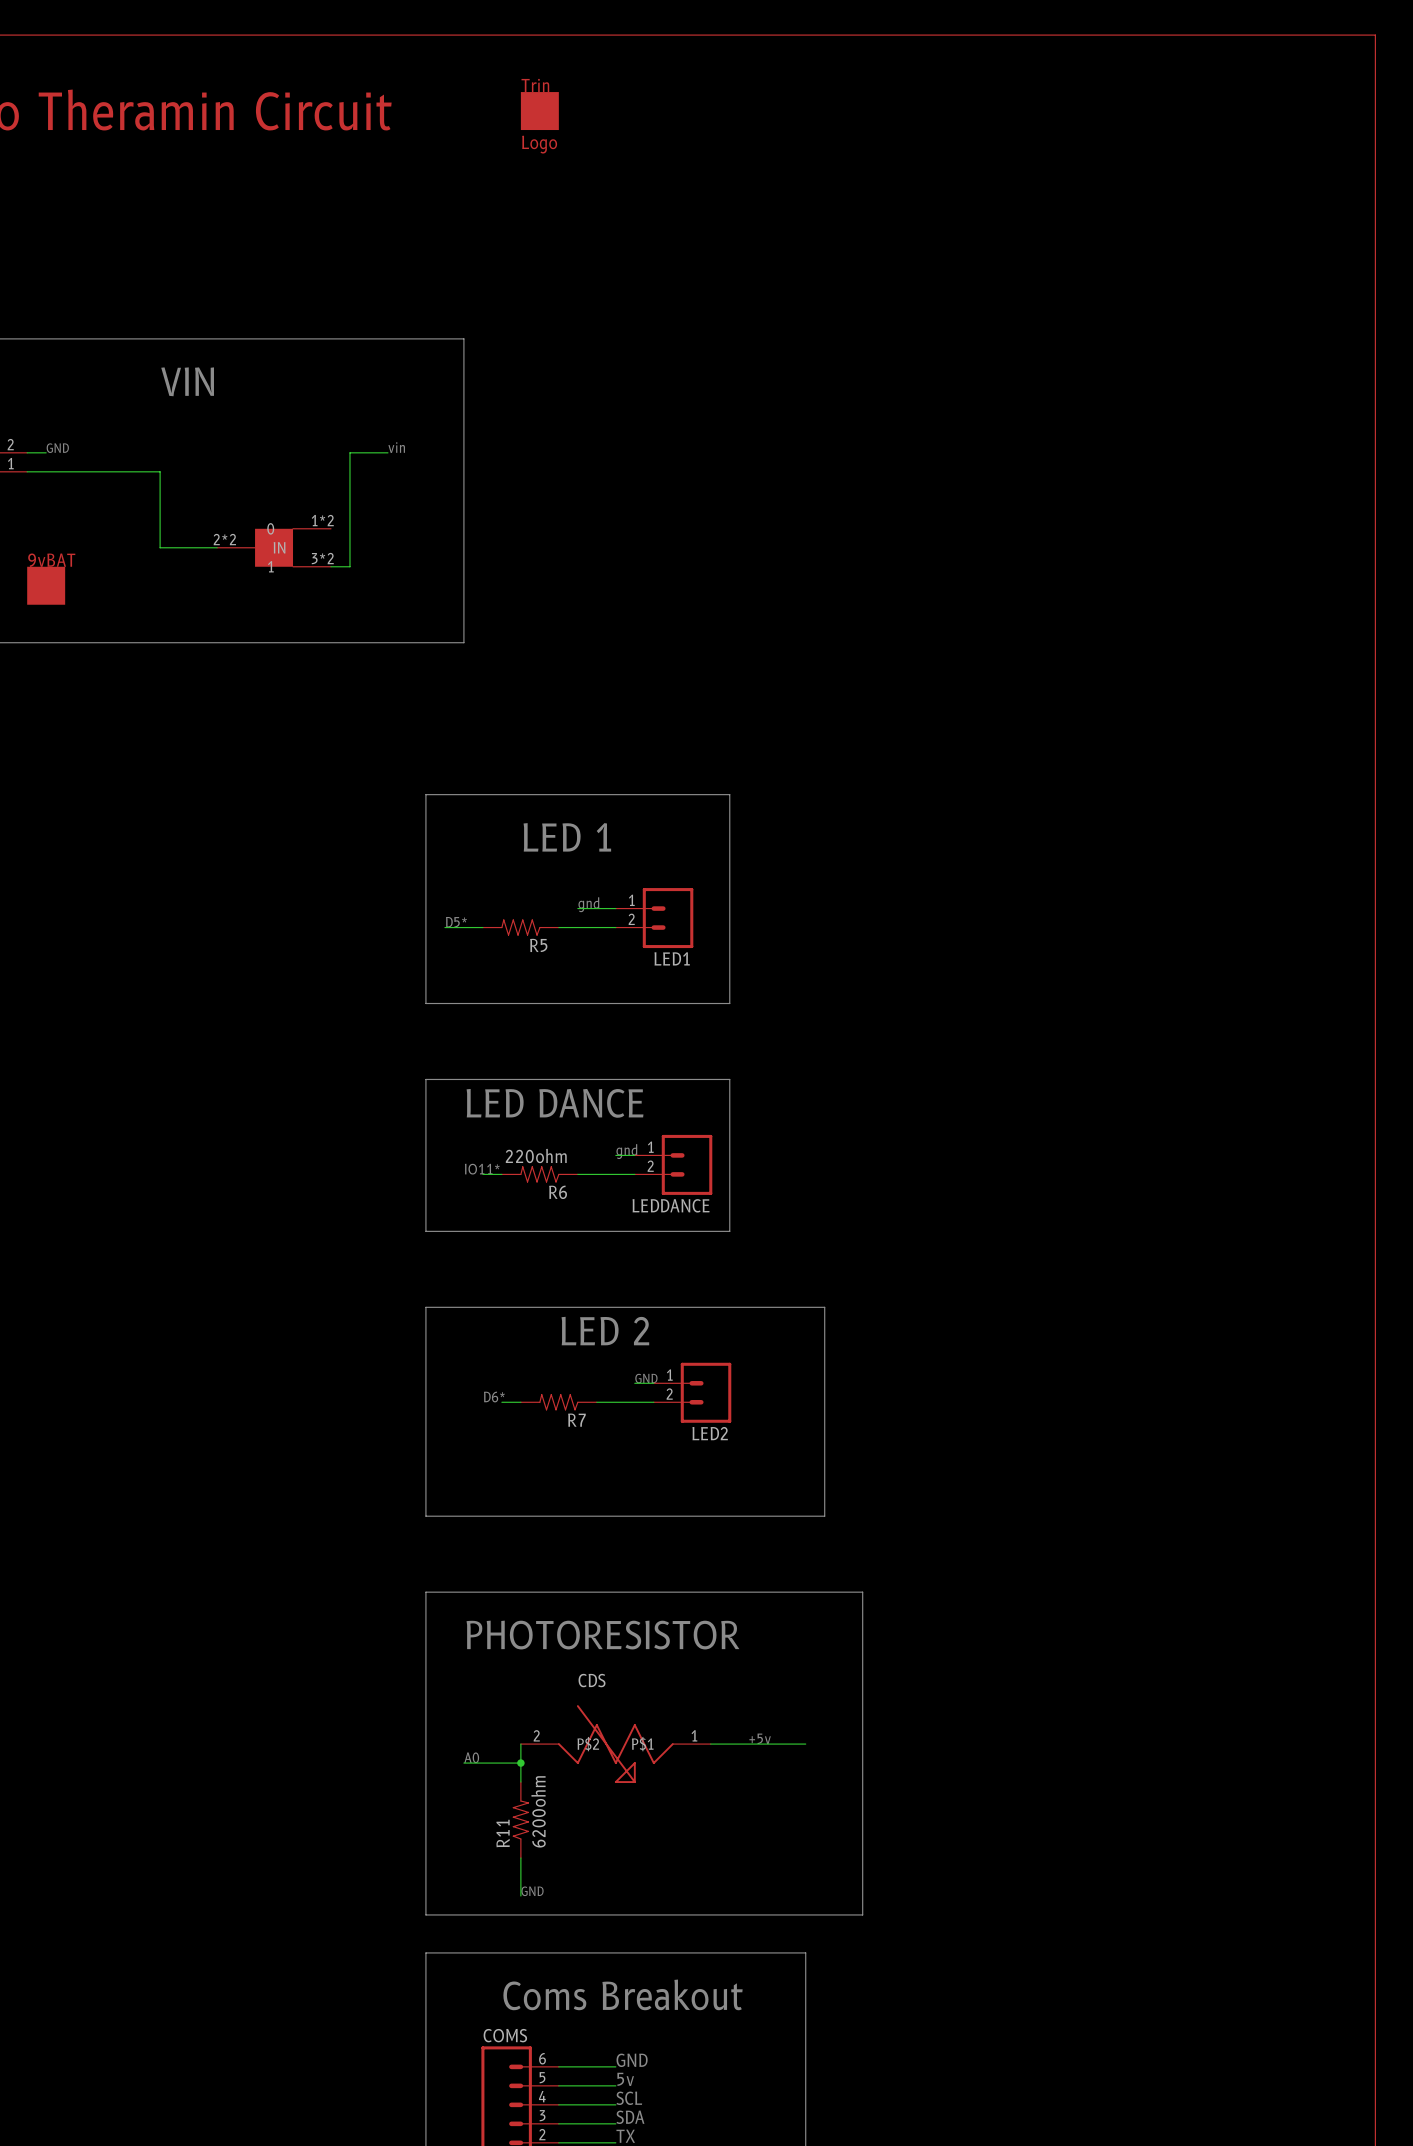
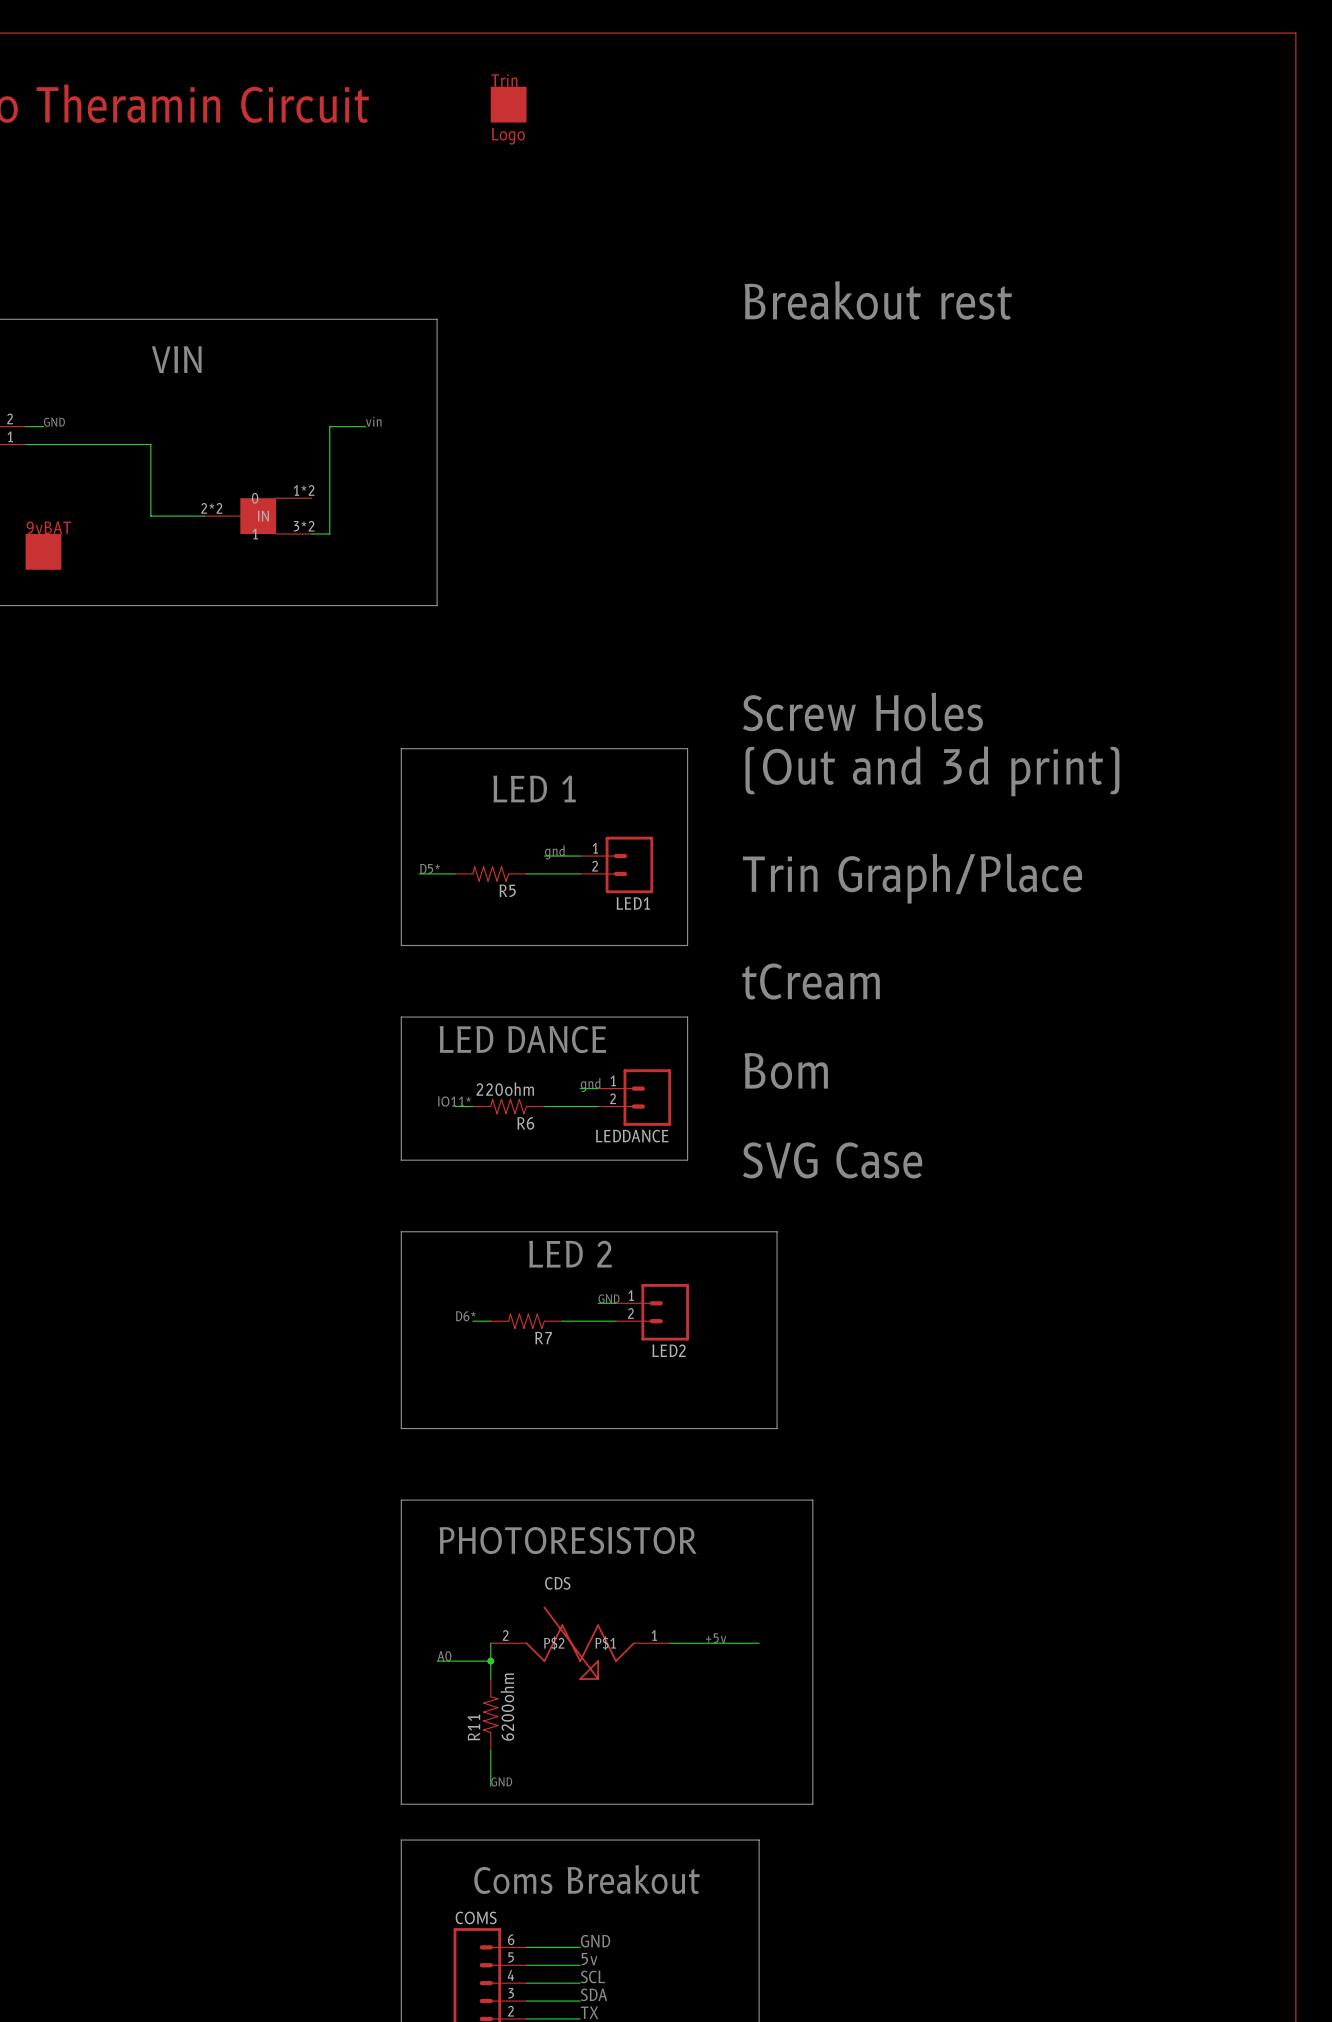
text: none -> Breakout rest (878, 300)
text: none -> Screw Holes (862, 711)
text: none -> (Out and 3d print) (932, 771)
text: none -> Trin Graph/Place (912, 878)
text: none -> tCream (811, 981)
text: none -> Bom (786, 1071)
text: none -> SVG Case (832, 1160)

